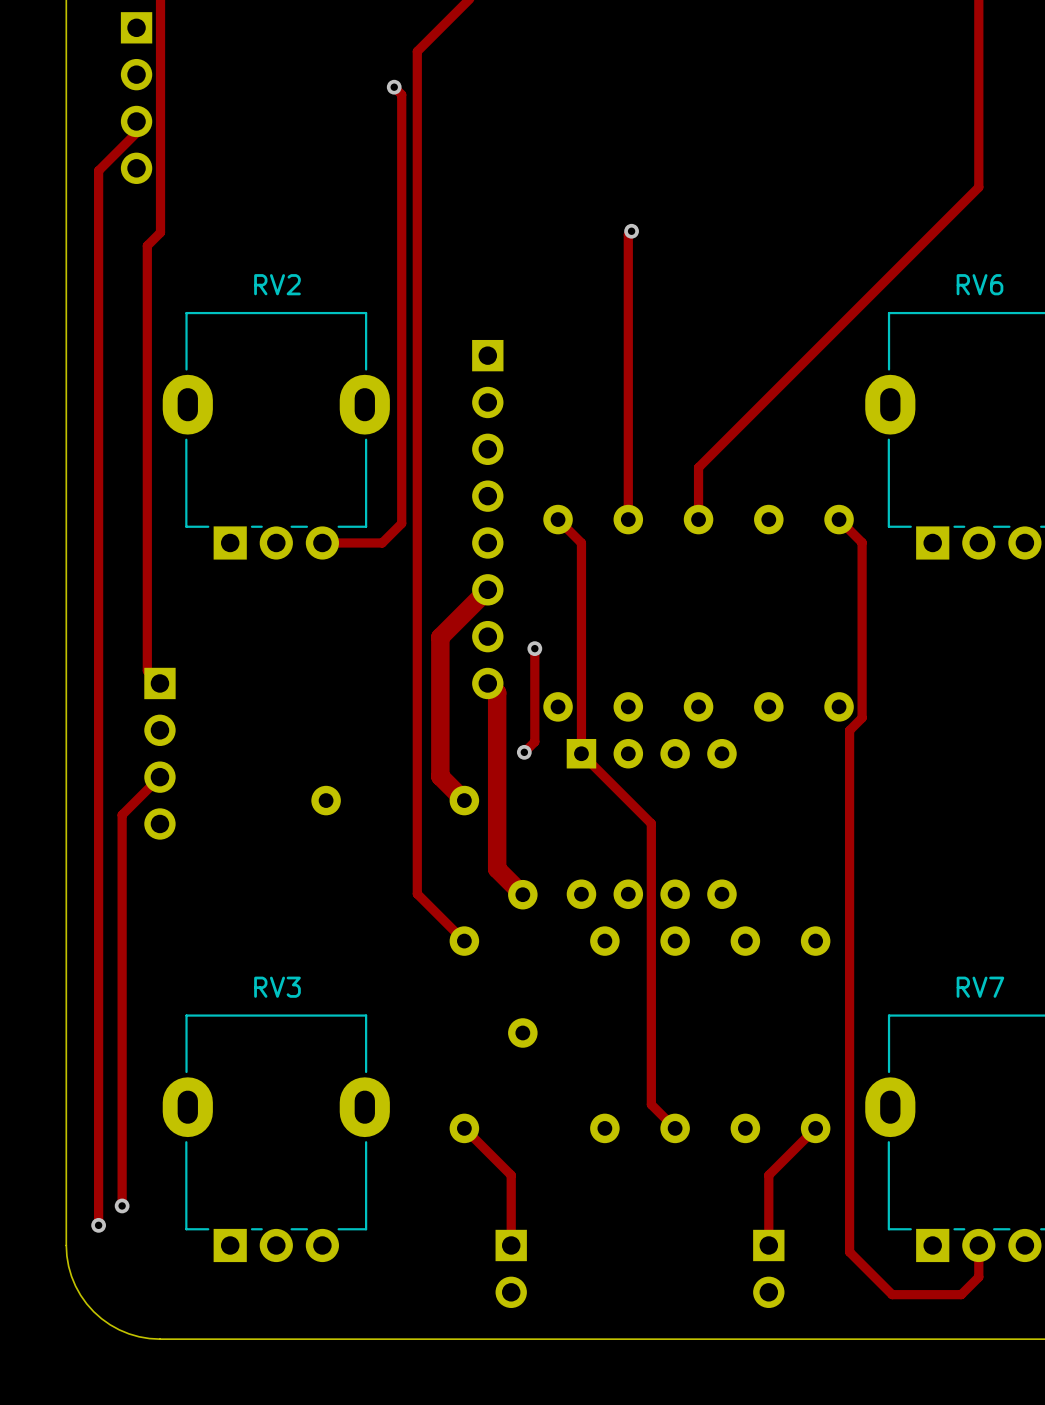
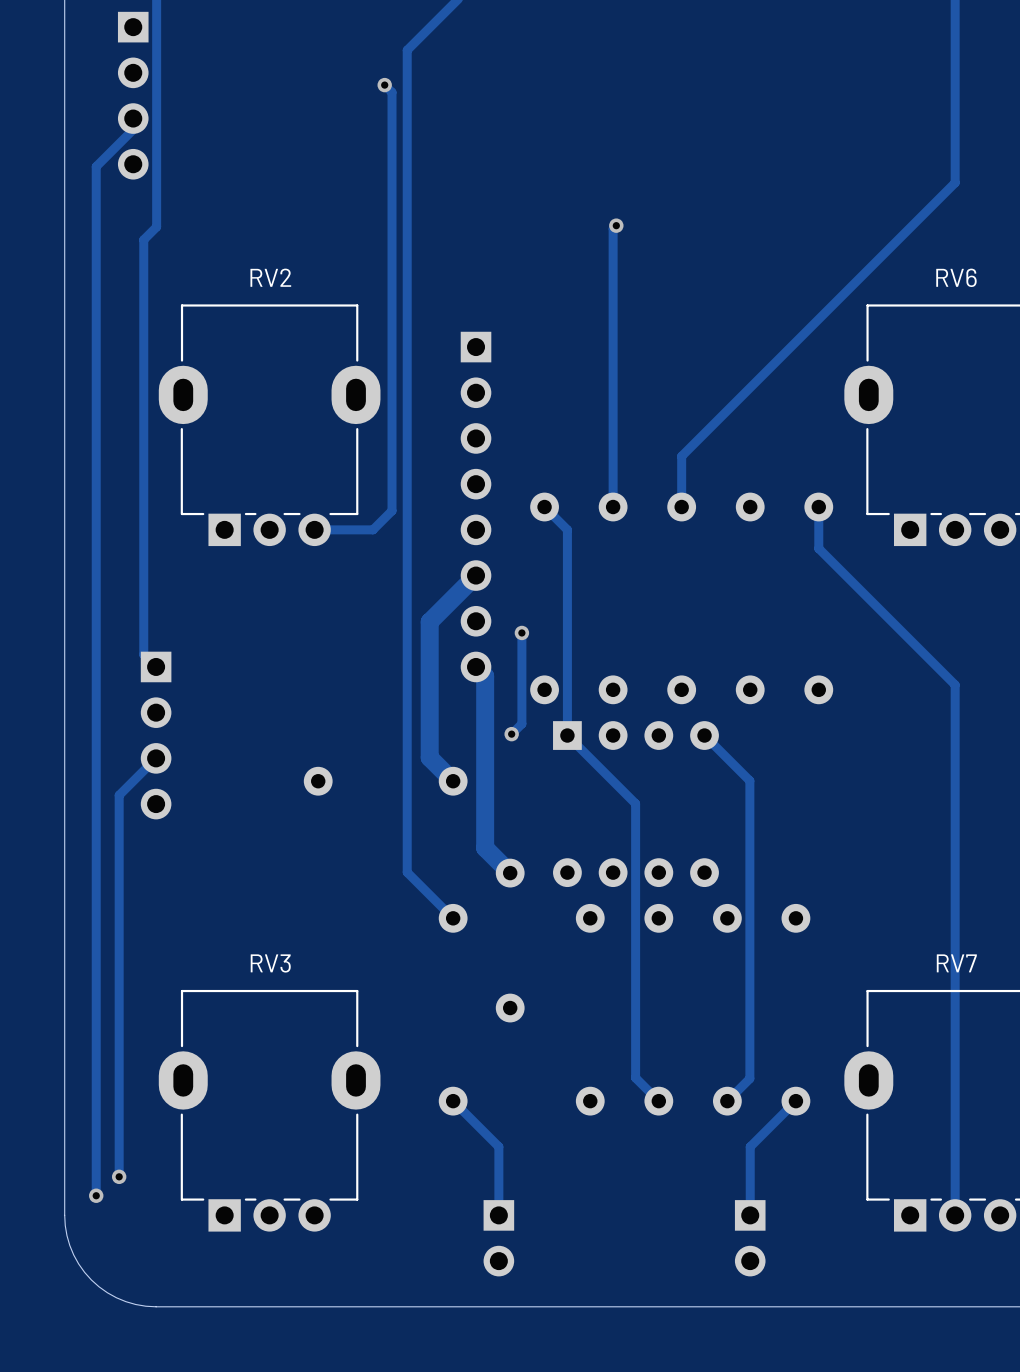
track: (839, 519) (862, 542) (862, 717) (849, 730) (849, 1252) (892, 1294) (961, 1294) (978, 1277) (978, 1245) -> (818, 507) (818, 548) (955, 684) (955, 1215)
track: none -> (704, 735) (749, 780) (749, 1078) (727, 1101)

